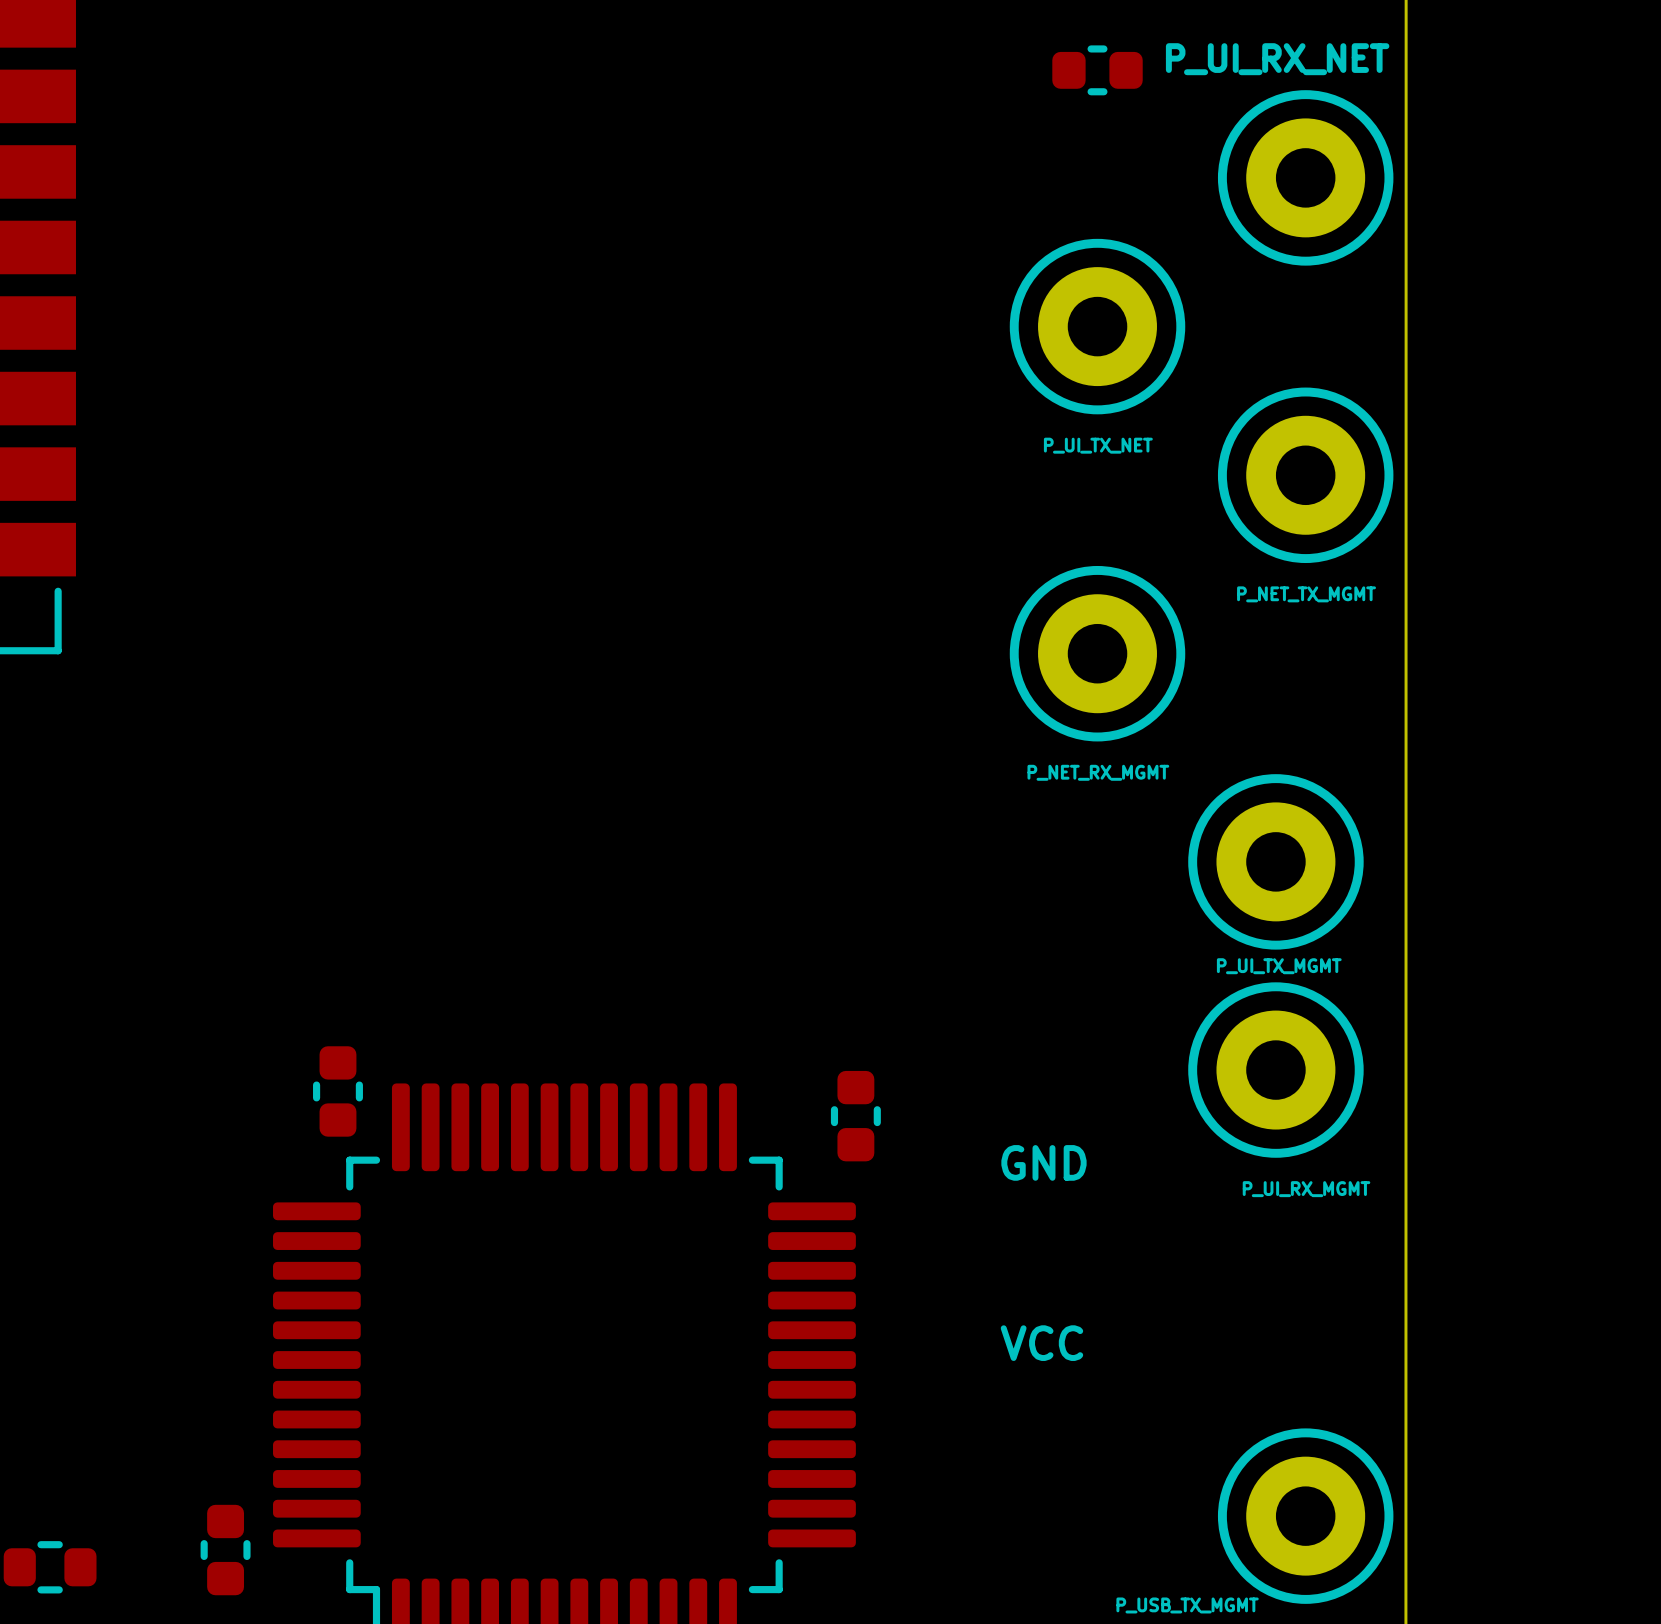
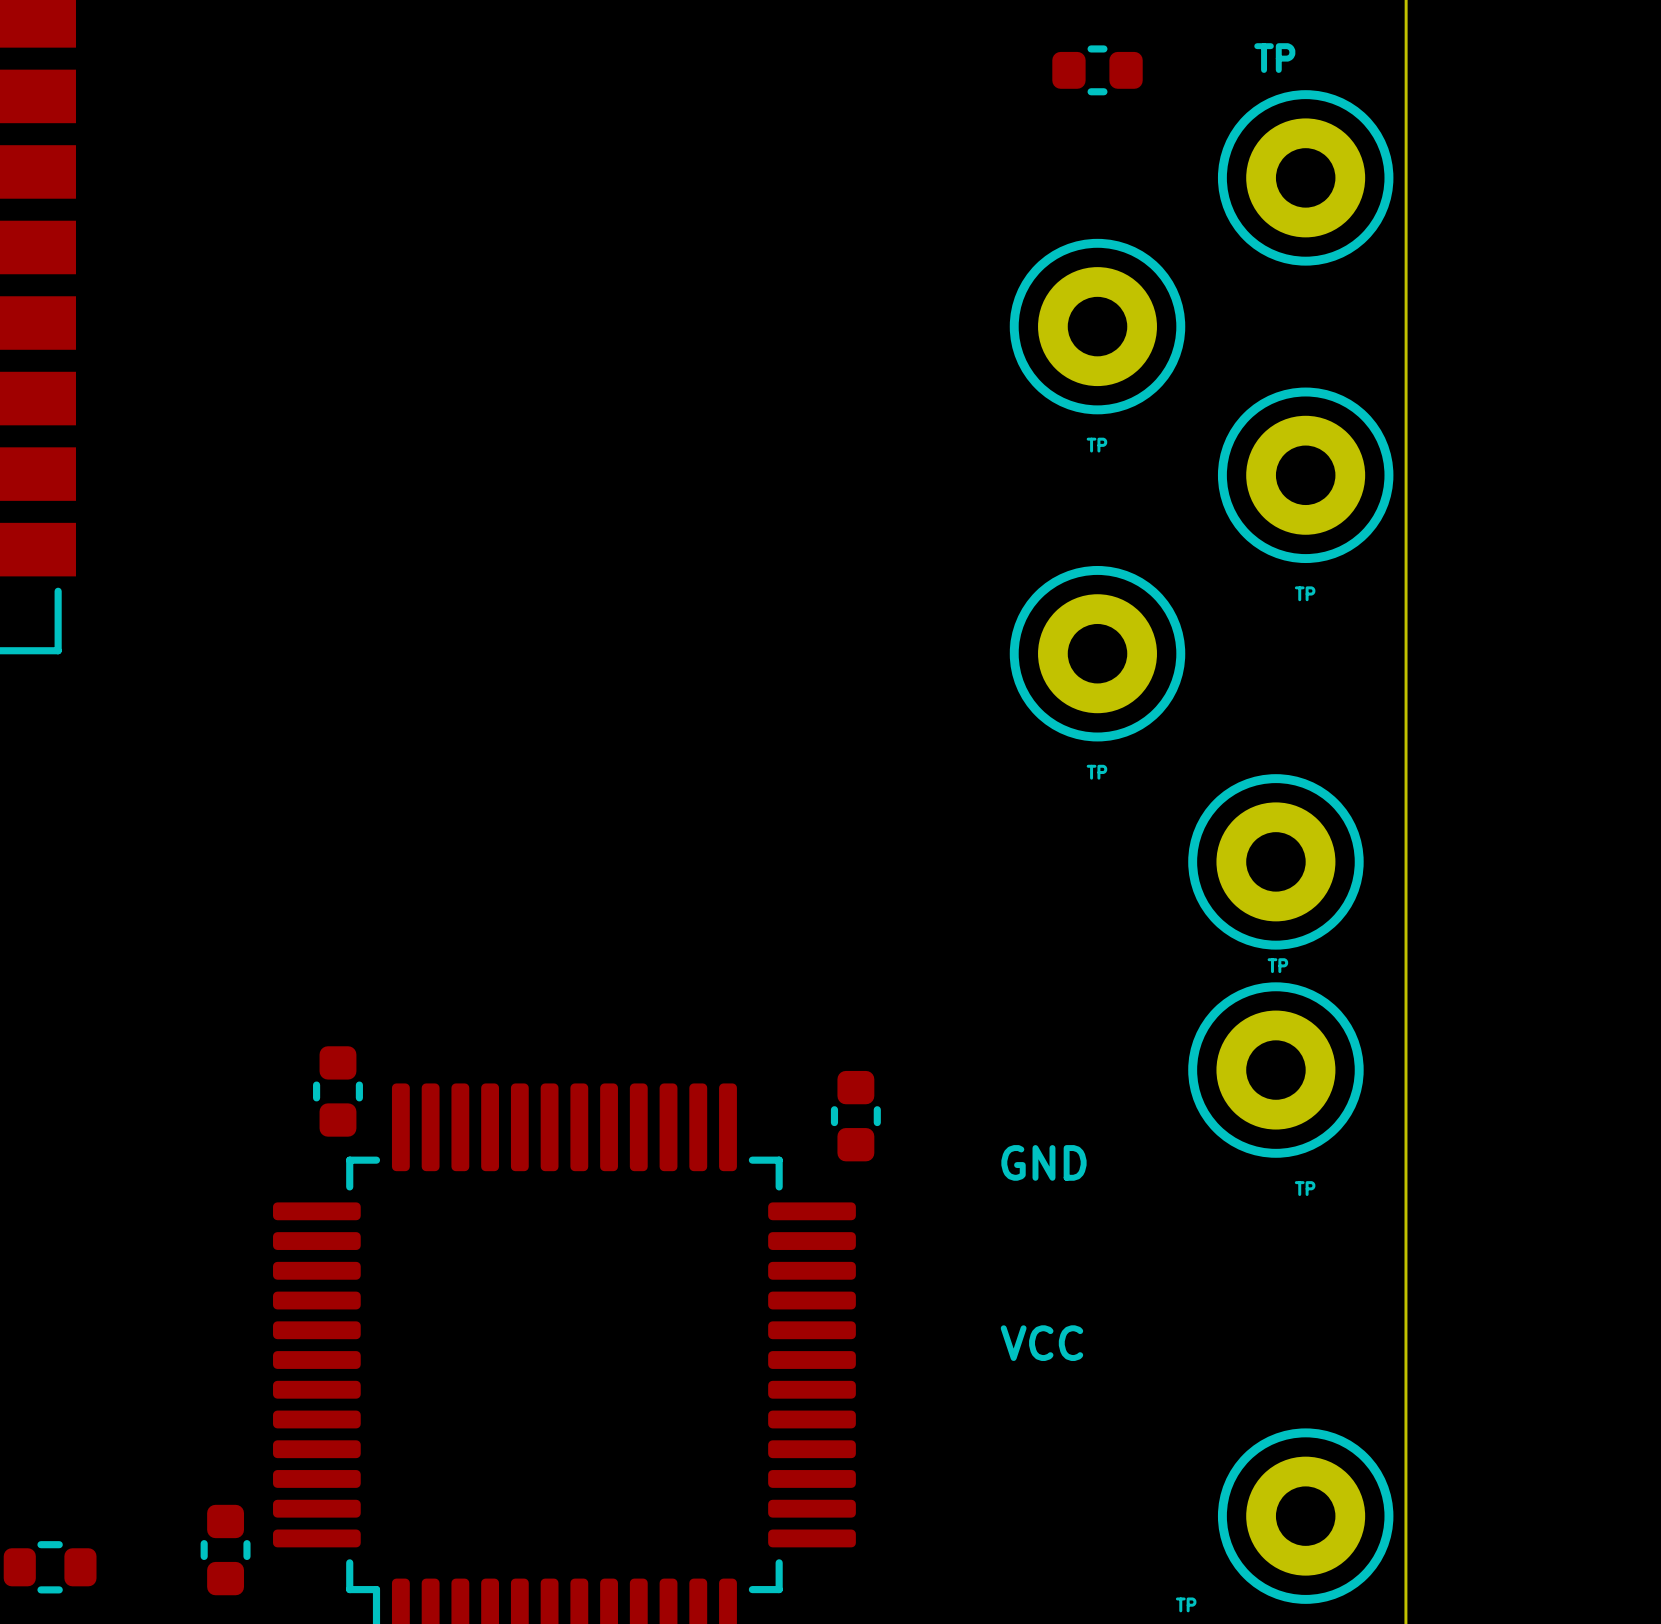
part value: P_UI_RX_NET (1277, 59) -> TP (1274, 58)
part value: P_UI_TX_NET (1098, 445) -> TP (1096, 445)
part value: P_NET_TX_MGMT (1306, 594) -> TP (1305, 593)
part value: P_NET_RX_MGMT (1098, 772) -> TP (1096, 772)
part value: P_UI_TX_MGMT (1279, 966) -> TP (1277, 965)
part value: P_UI_RX_MGMT (1306, 1189) -> TP (1305, 1188)
part value: P_USB_TX_MGMT (1187, 1605) -> TP (1186, 1604)

